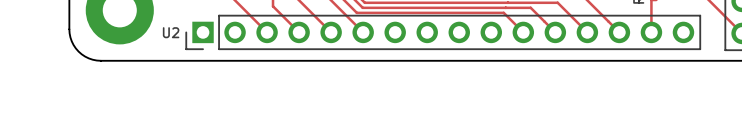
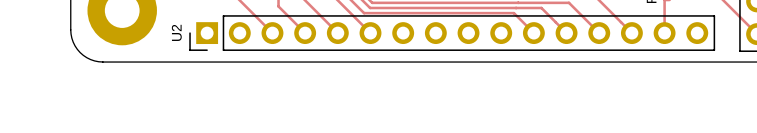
U2 name rotation: 0° (171, 32) -> 90° counterclockwise (176, 32)

